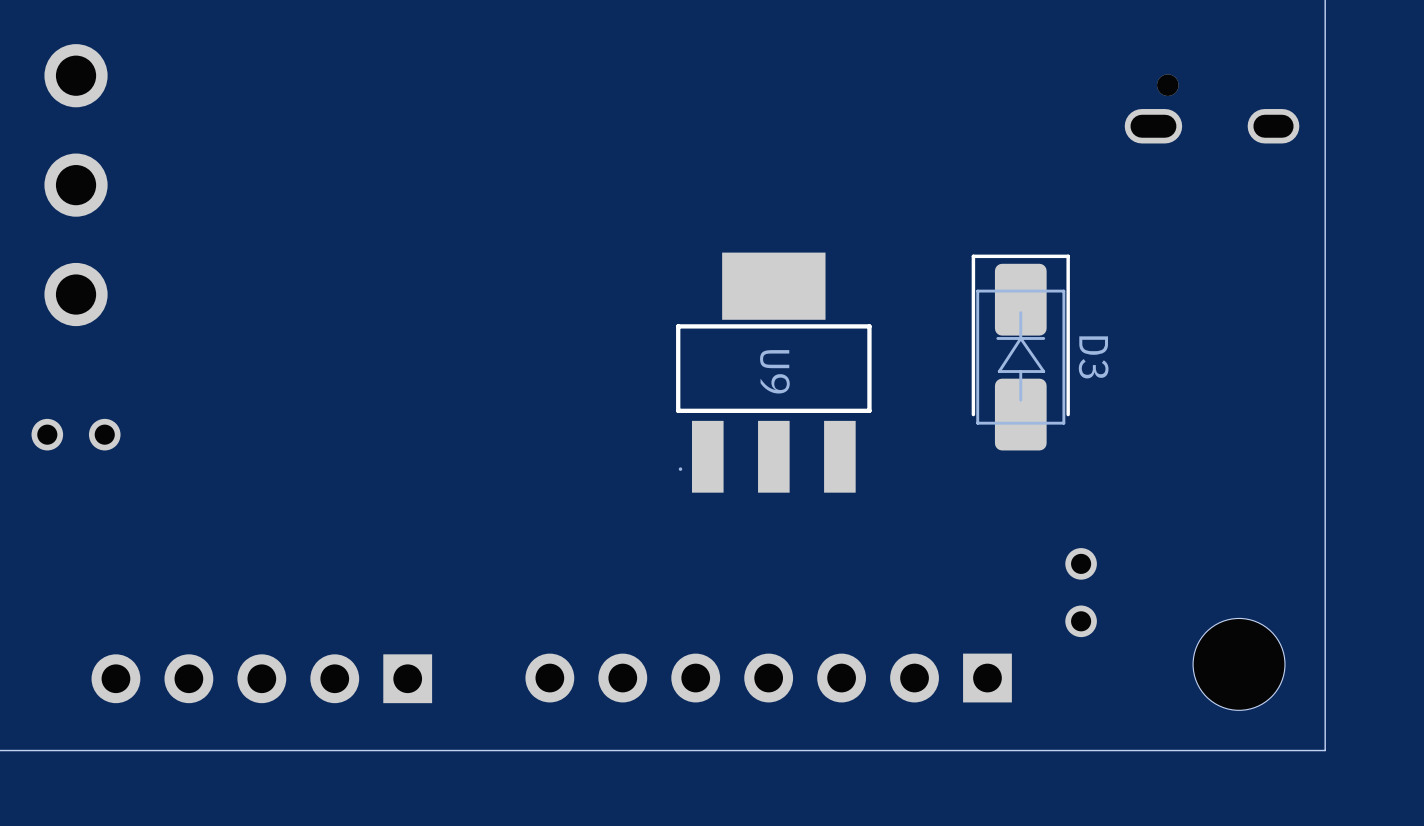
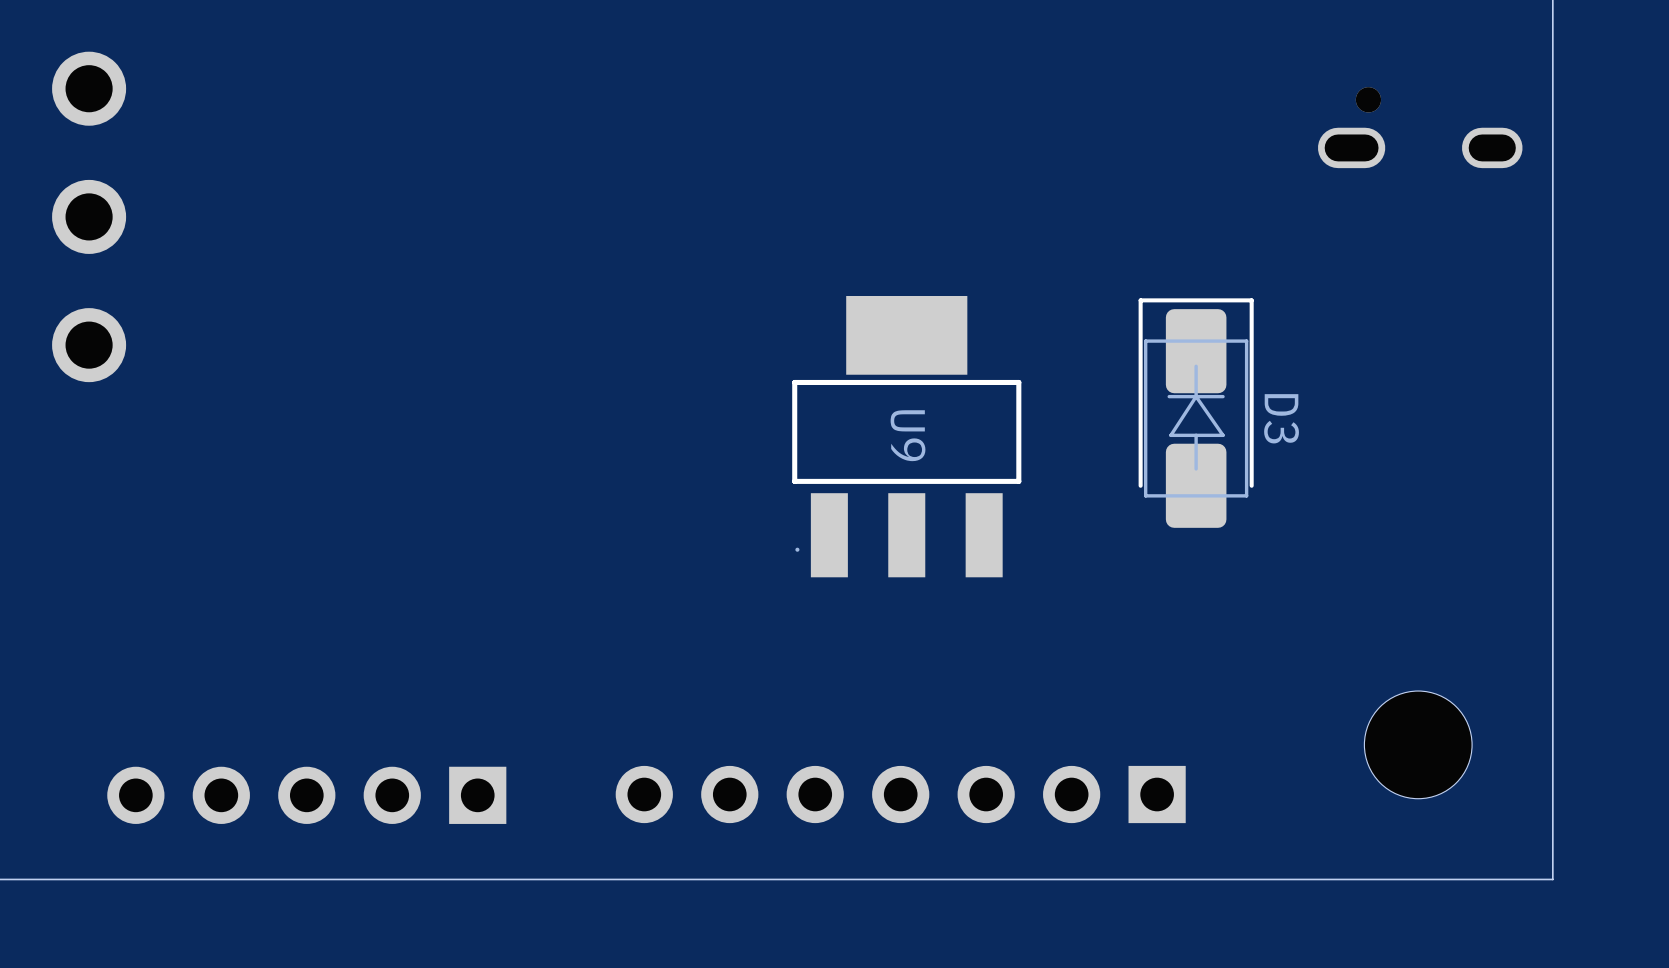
part: (76, 434) -> none
part: (1081, 592) -> none
part position: (1239, 664) -> (1418, 744)

